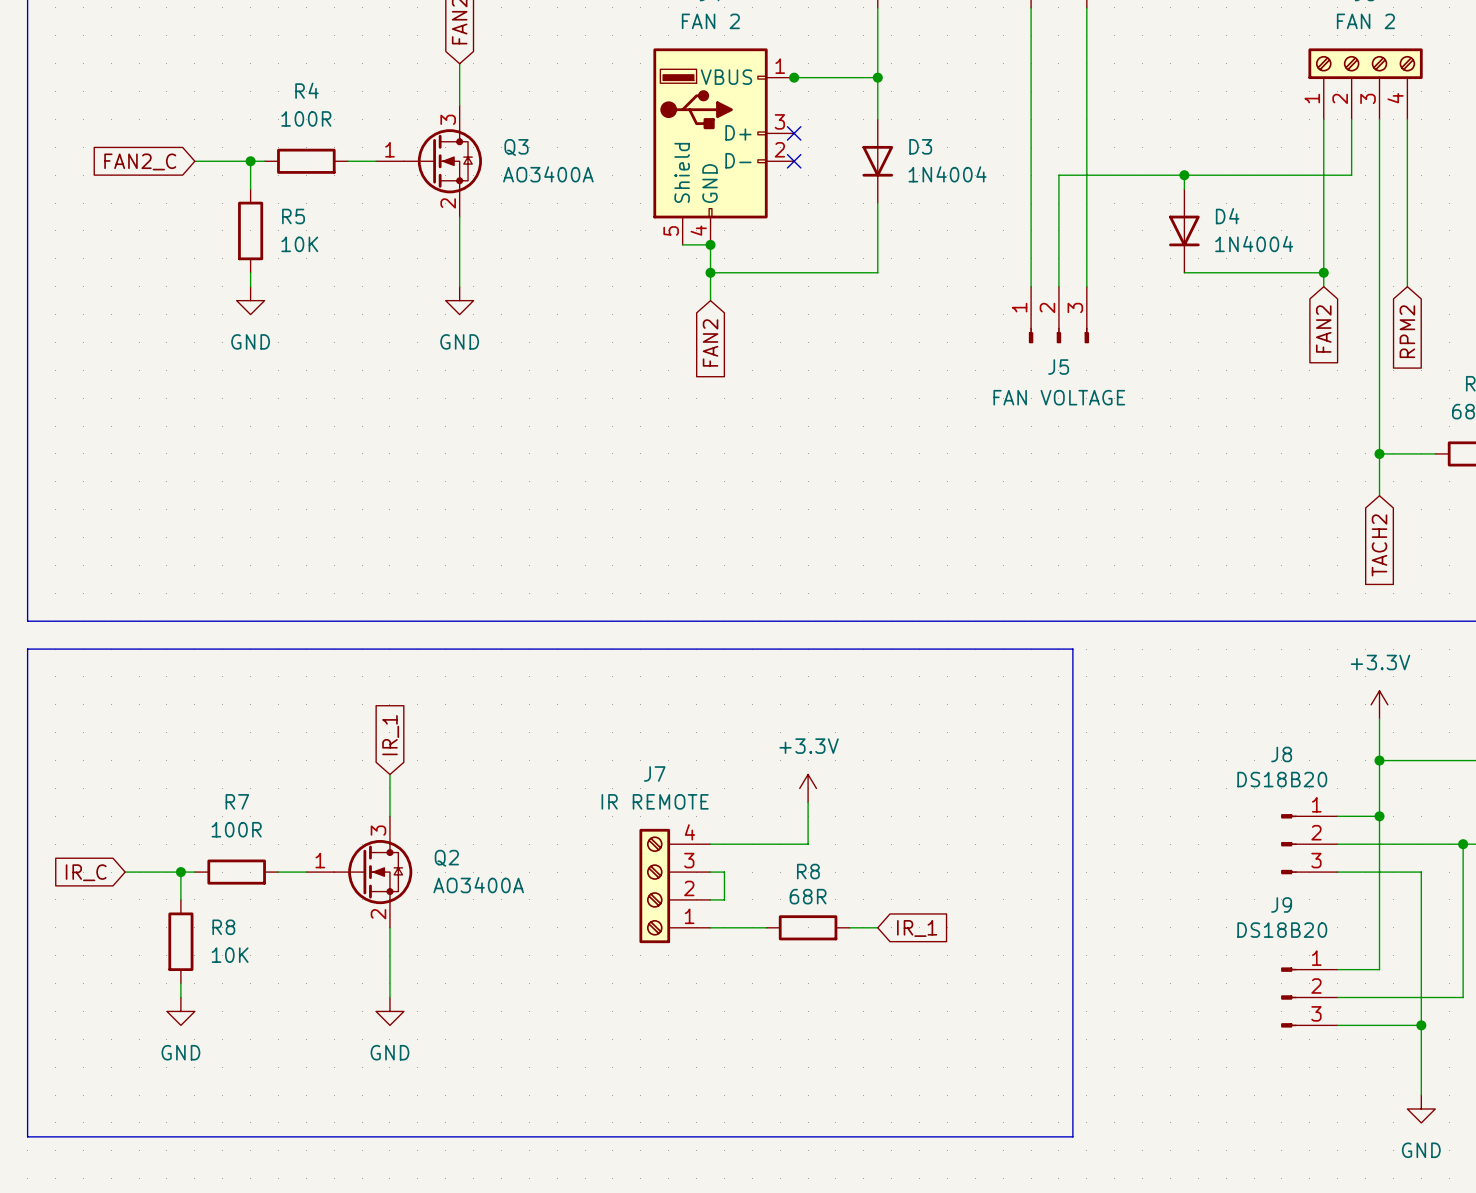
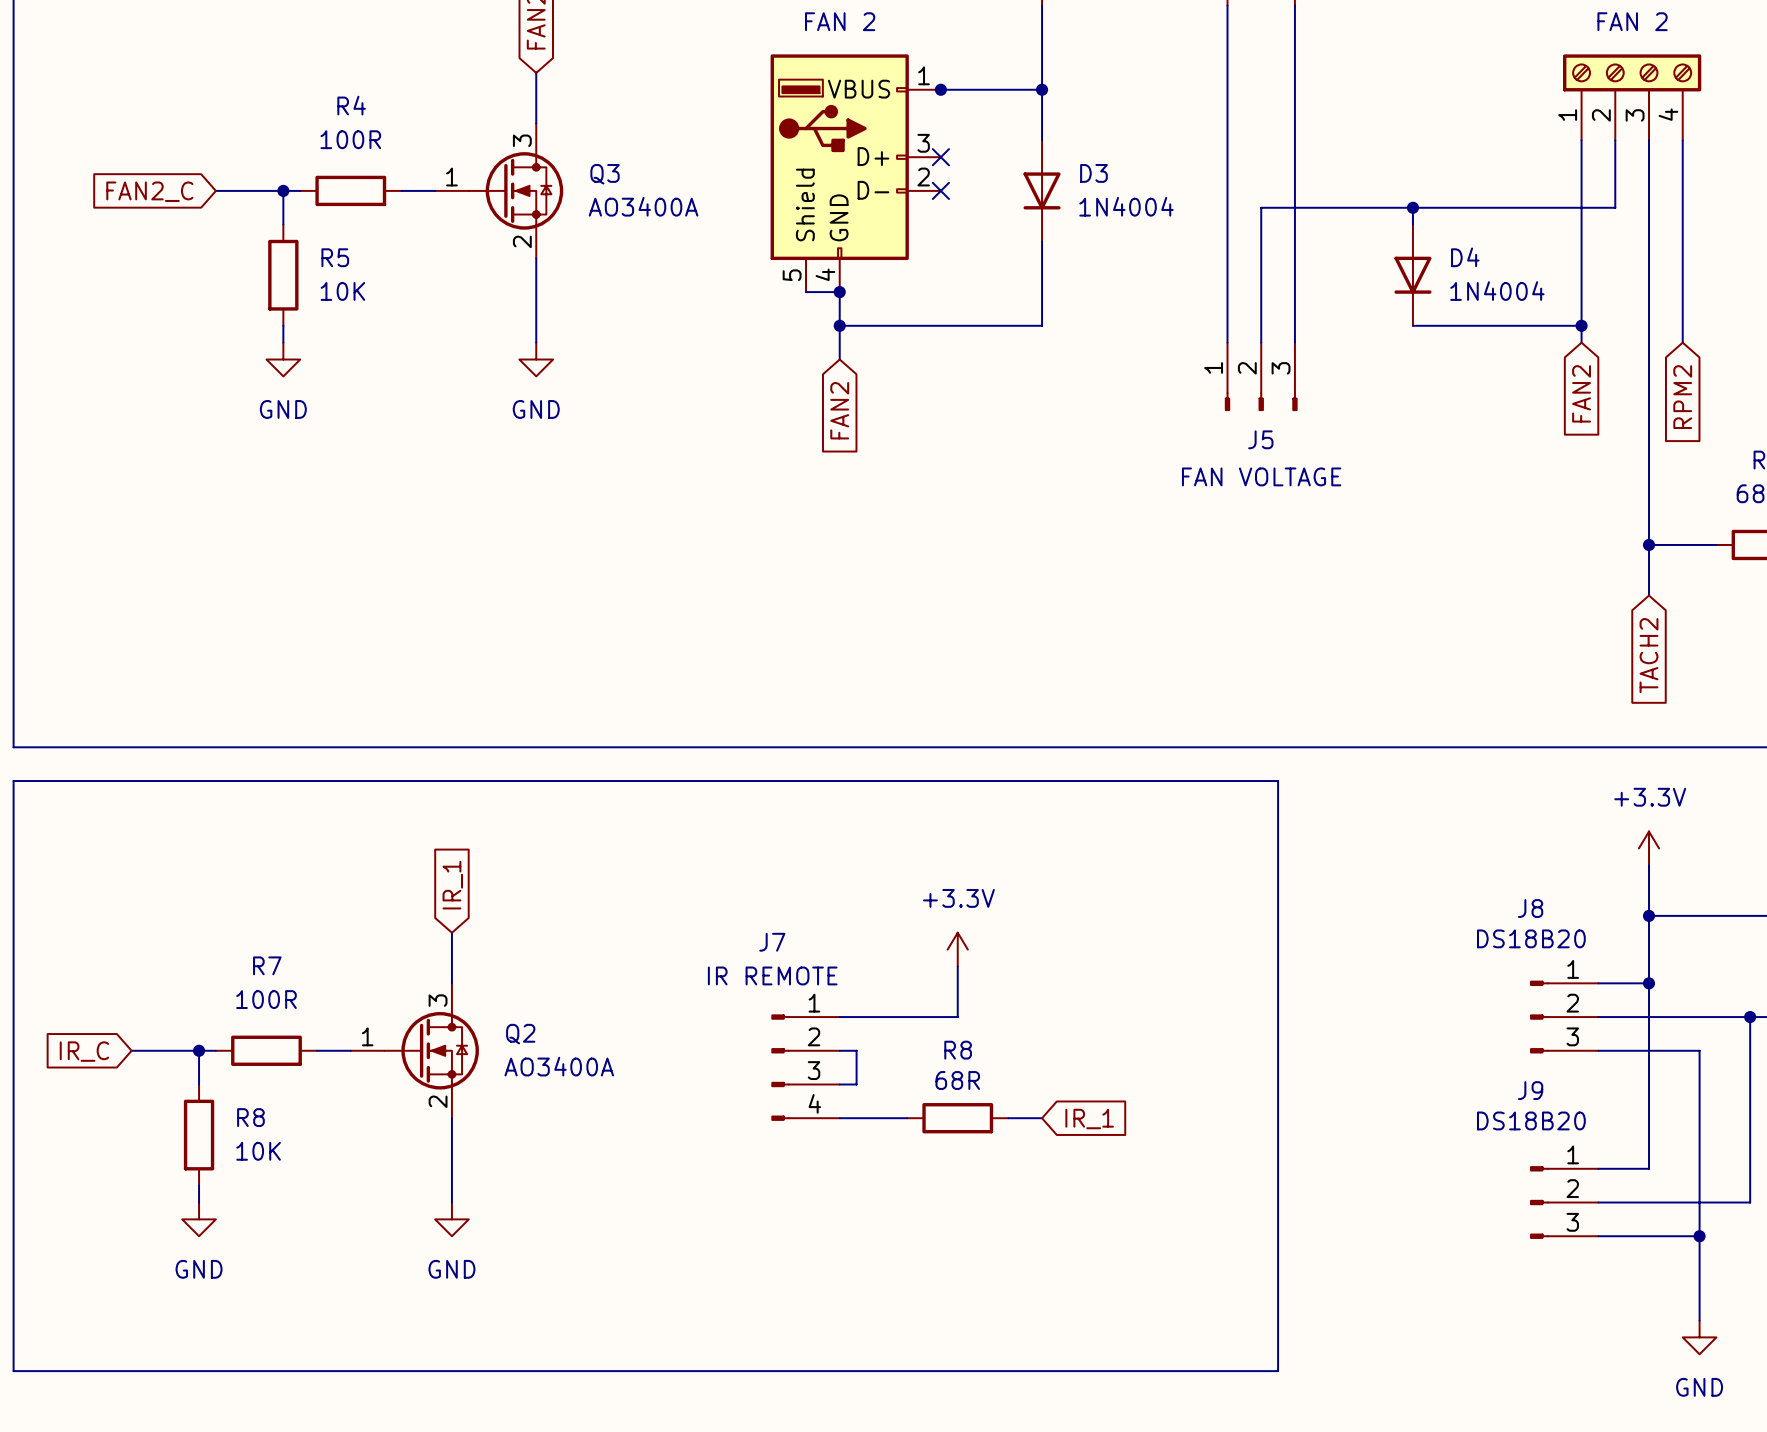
J7 symbol: [639, 828, 711, 944] -> [771, 1014, 840, 1121]

